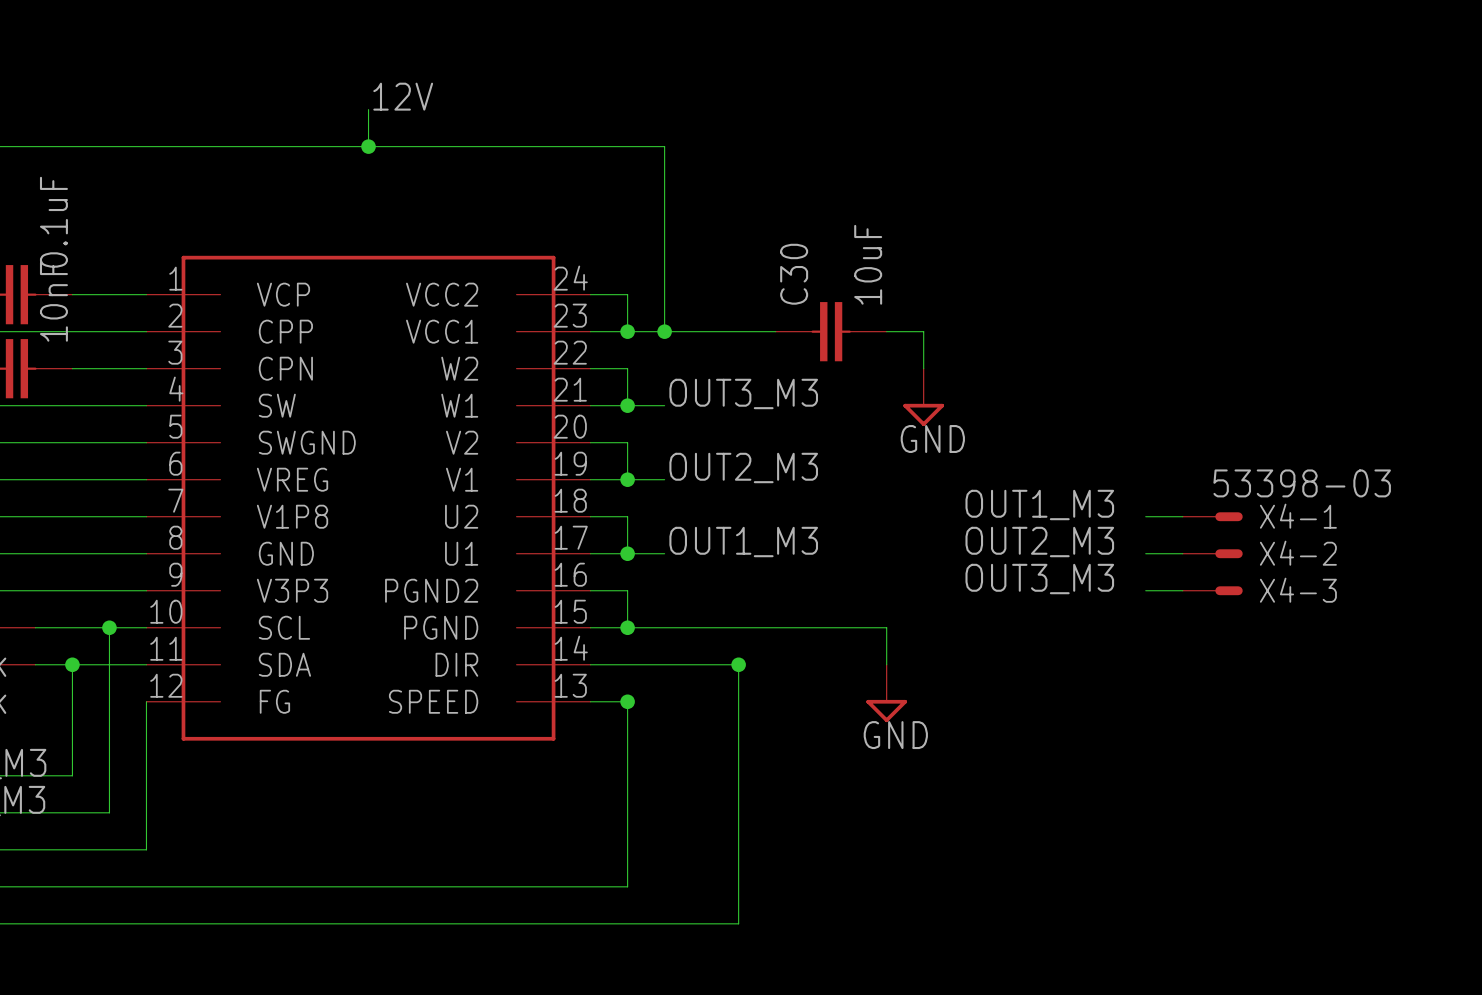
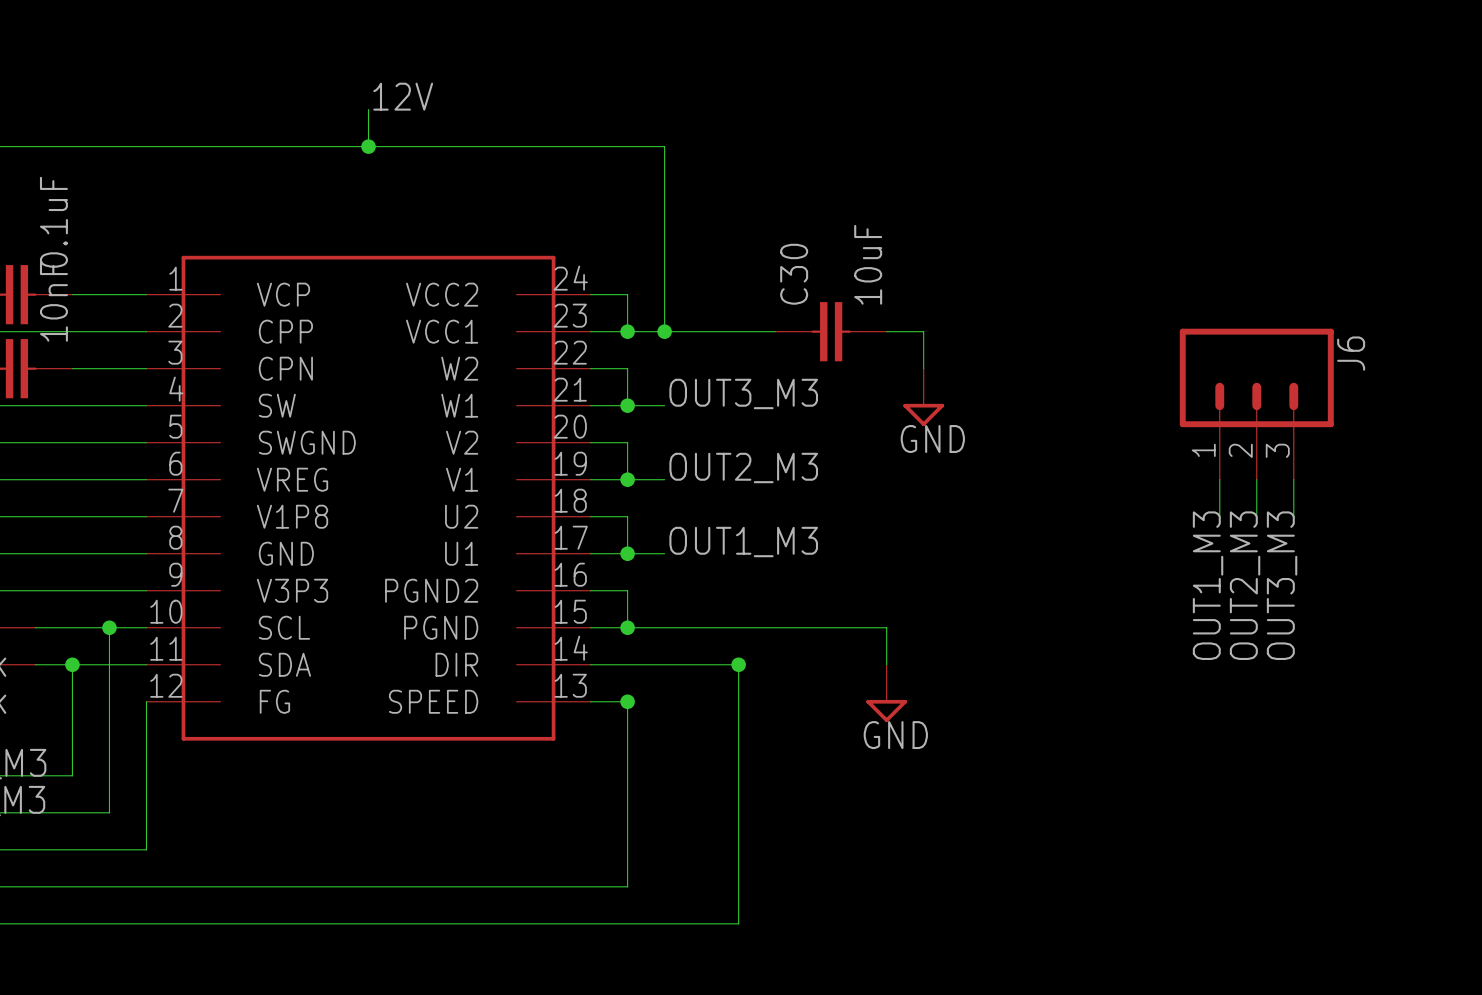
J6: none -> (1256, 404)
wire: none -> (1219, 479) (1219, 516)
wire: none -> (1256, 479) (1256, 516)
wire: none -> (1293, 479) (1293, 516)
label rotation: 0° (1039, 505) -> 90° counterclockwise (1208, 585)
wire: (1145, 516) (1182, 516) -> none
X4-1: 53398-03 (1212, 516) -> none
label rotation: 0° (1039, 542) -> 90° counterclockwise (1245, 585)
label position: OUT2_M3 (1039, 542) -> OUT2_M3 (1245, 585)
wire: (1145, 553) (1182, 553) -> none
X4-2: (1212, 553) -> none
label rotation: 0° (1039, 579) -> 90° counterclockwise (1282, 585)
label position: OUT3_M3 (1039, 579) -> OUT3_M3 (1282, 585)
wire: (1145, 590) (1182, 590) -> none
X4-3: (1212, 590) -> none

